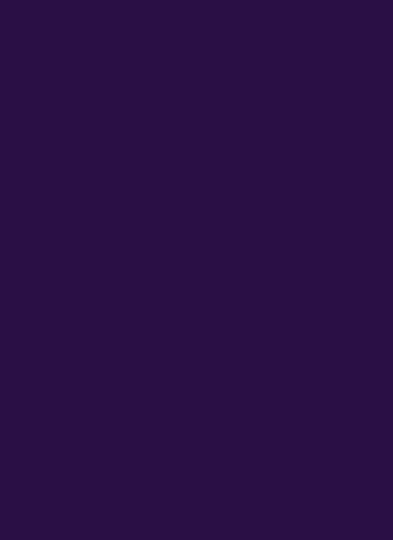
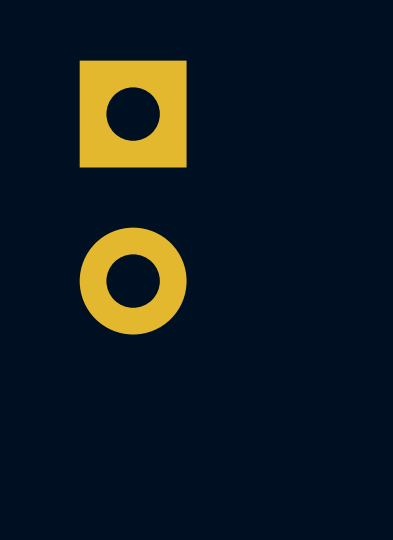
part: none -> (133, 197)

